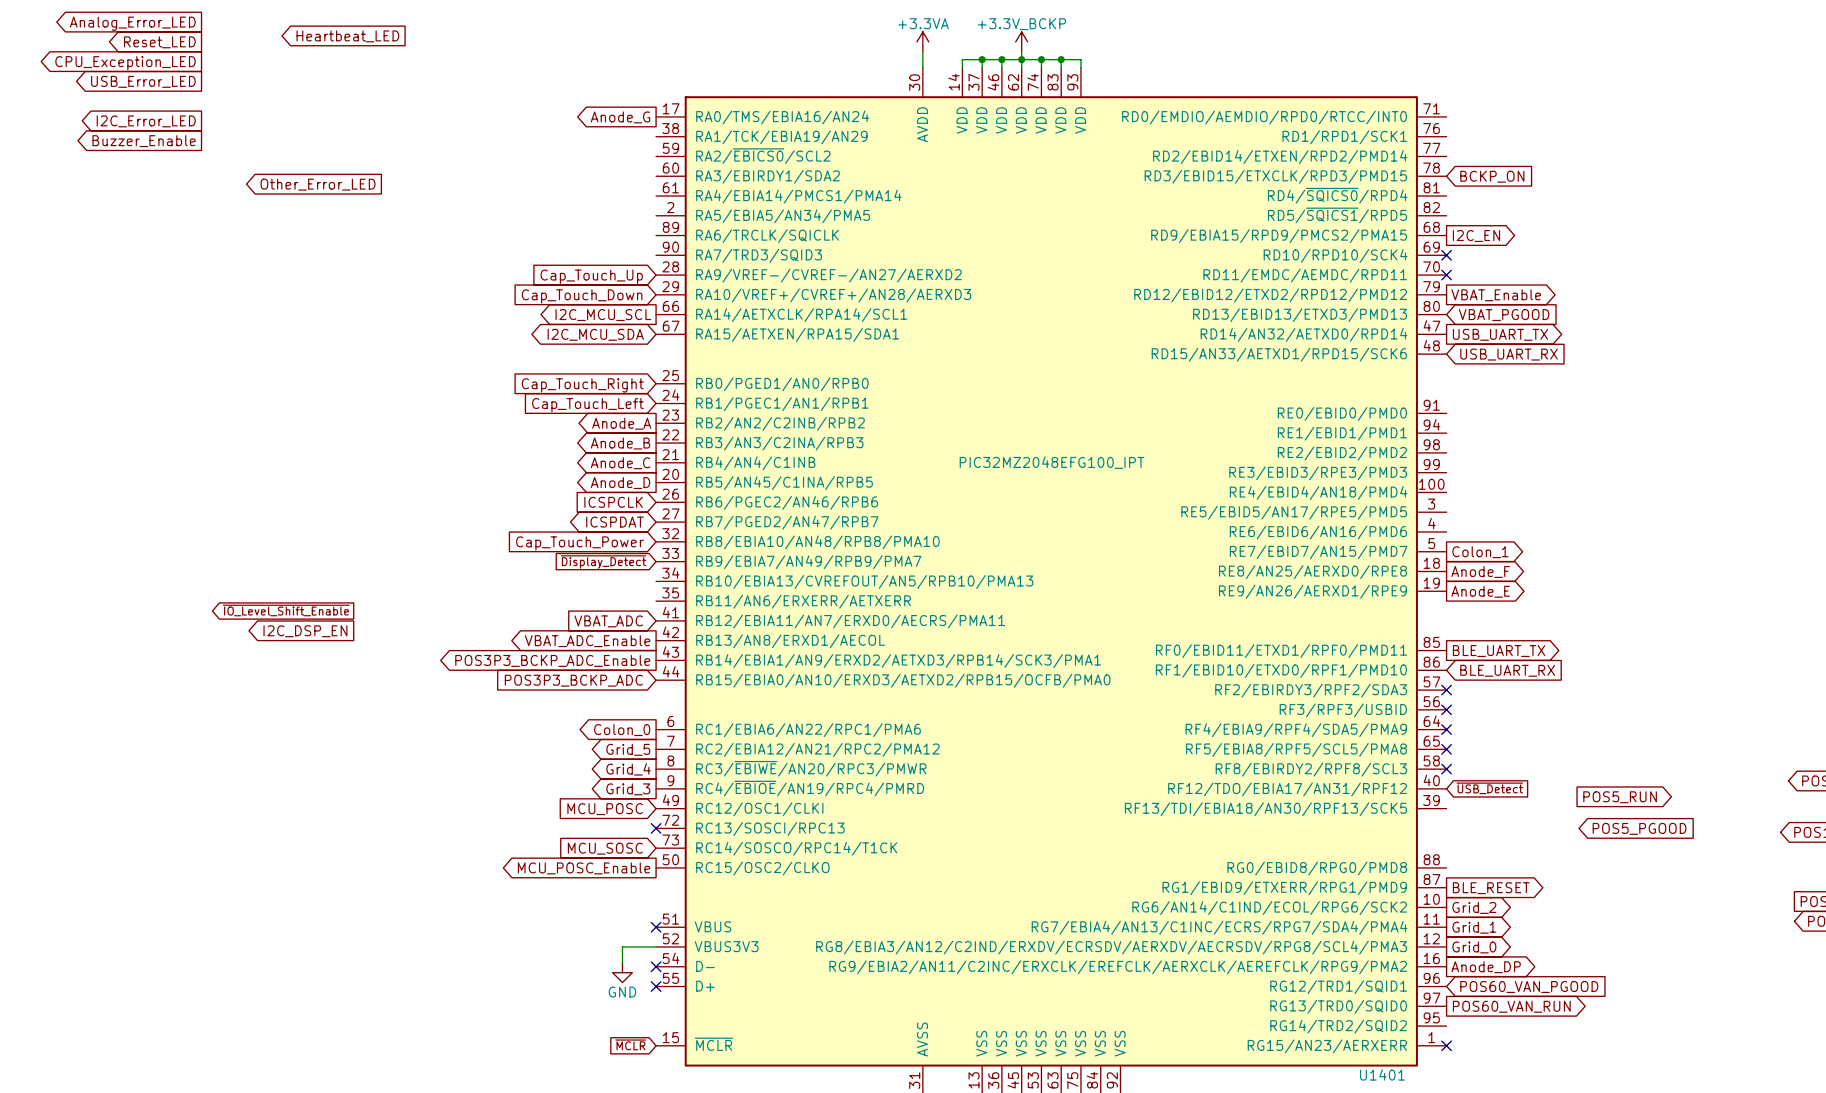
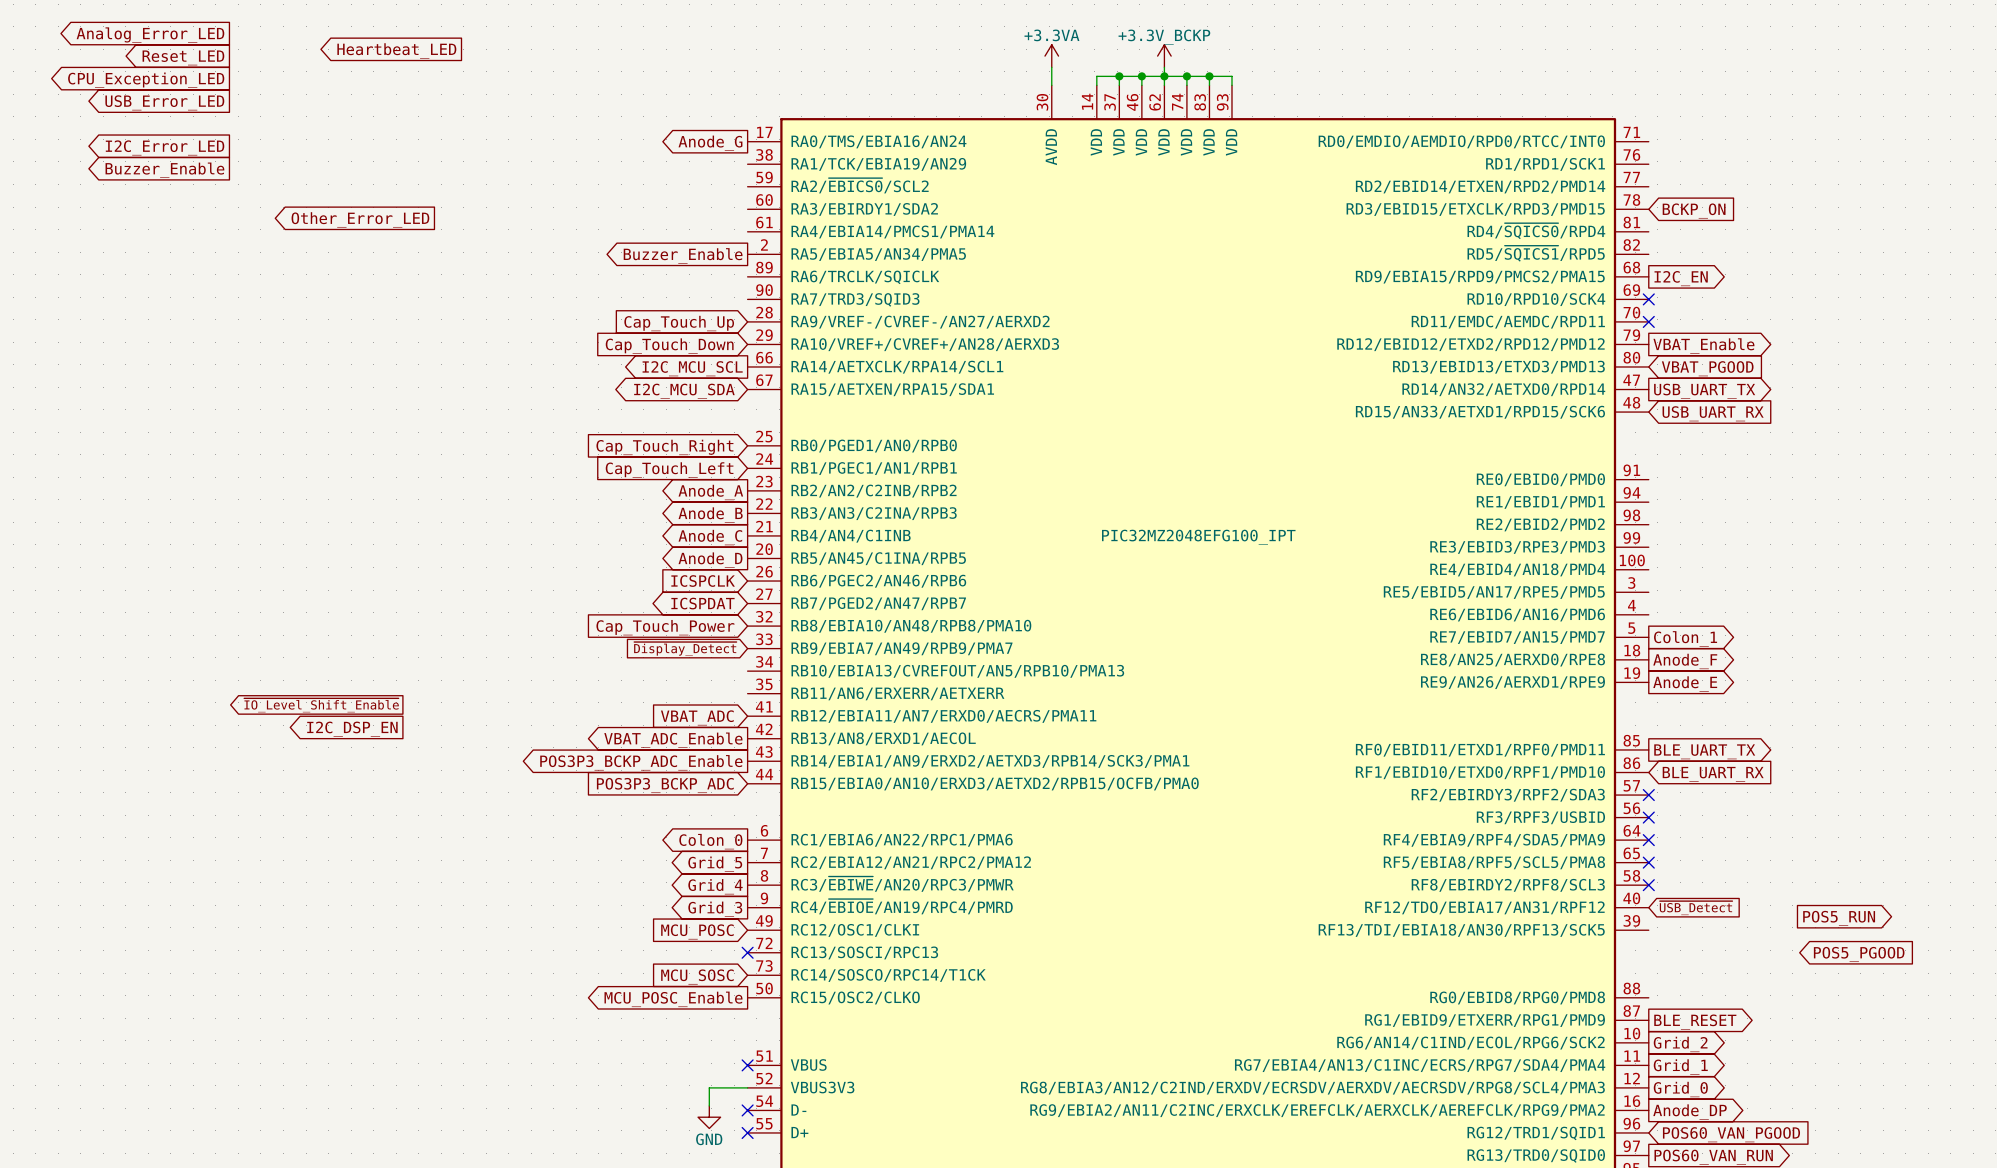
global label: none -> Buzzer_Enable (683, 255)

